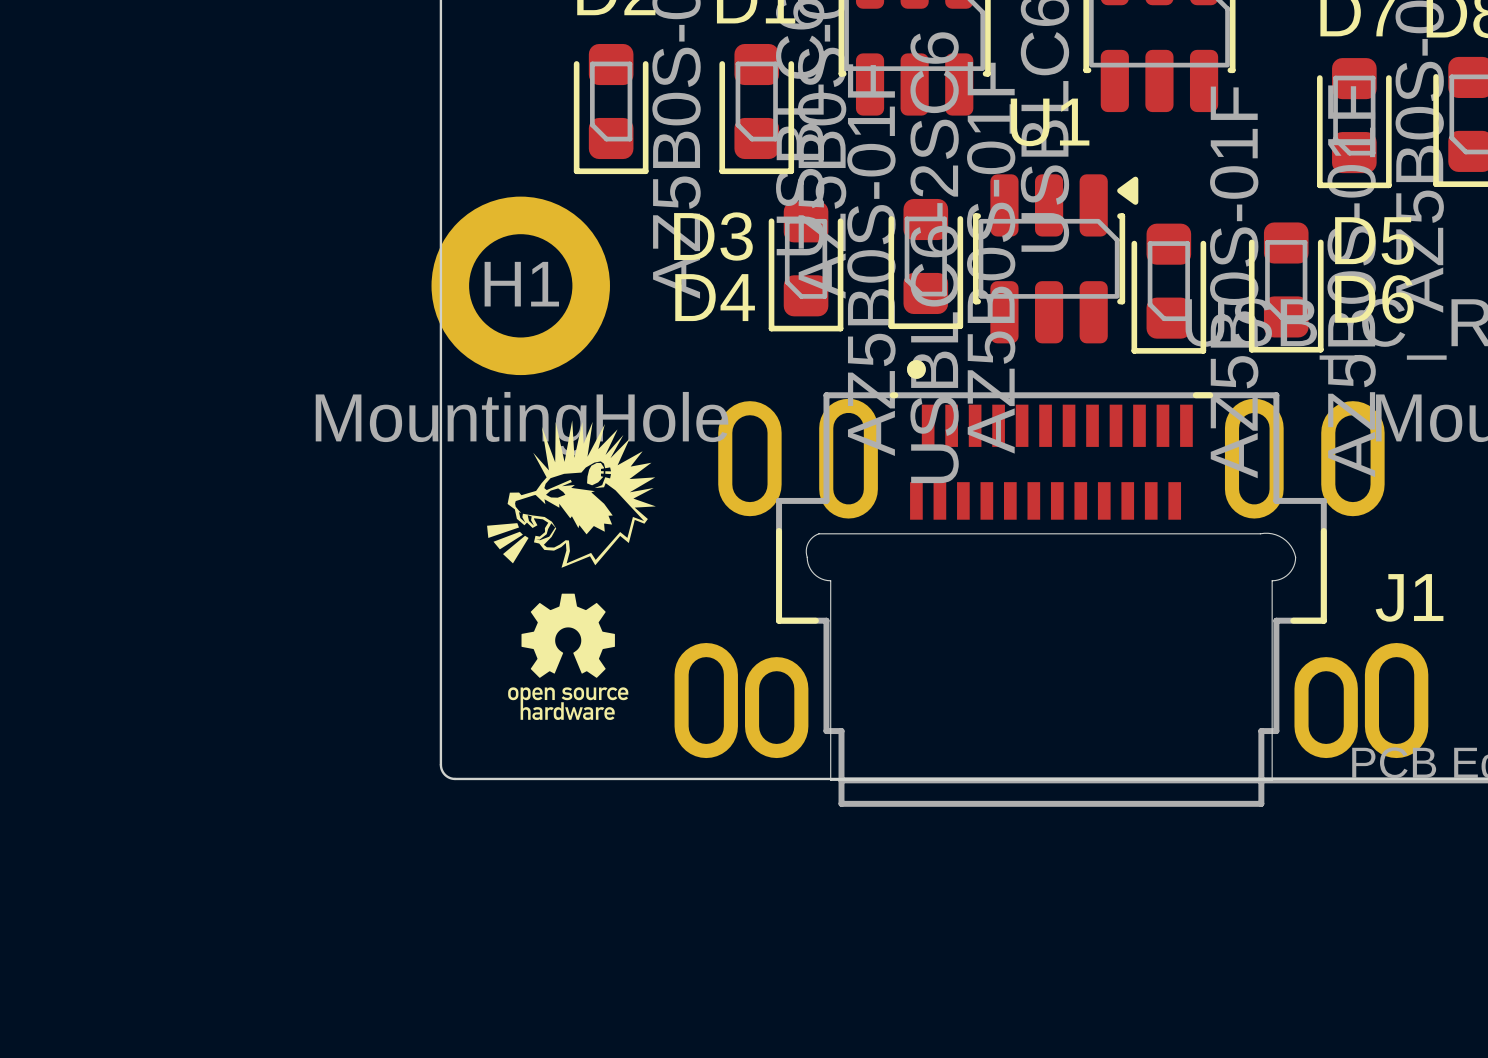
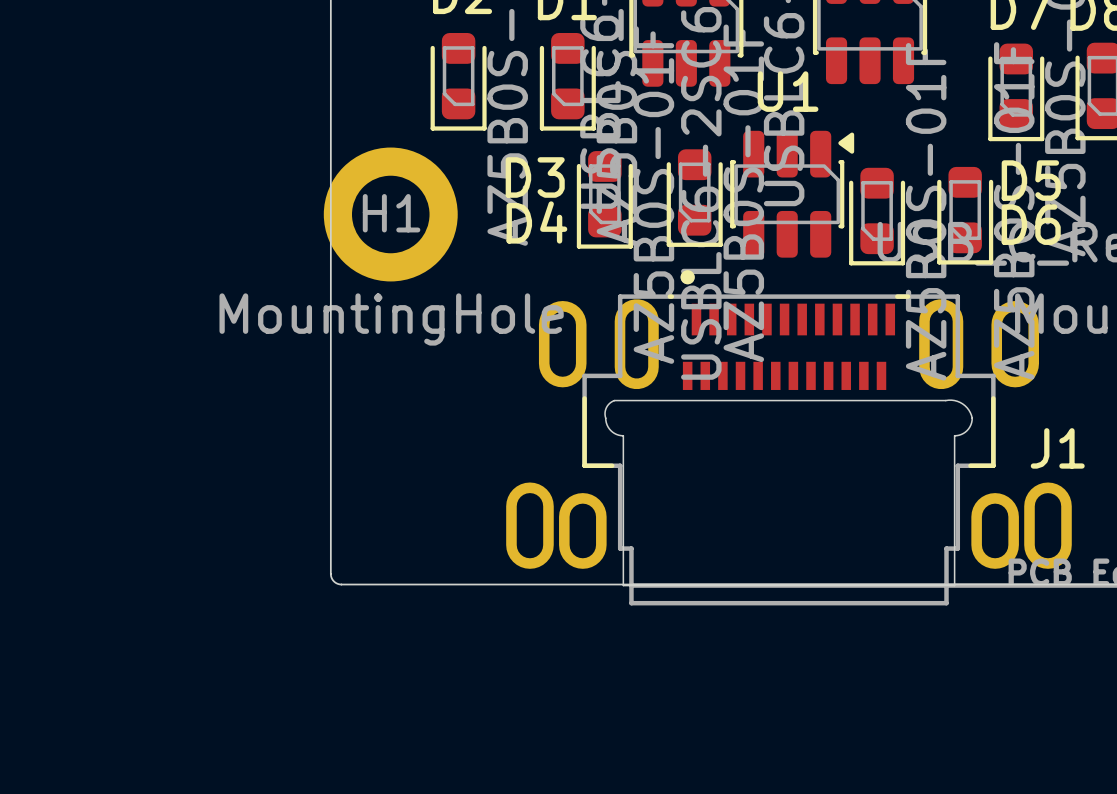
drawing: [487, 420, 656, 720] -> none

